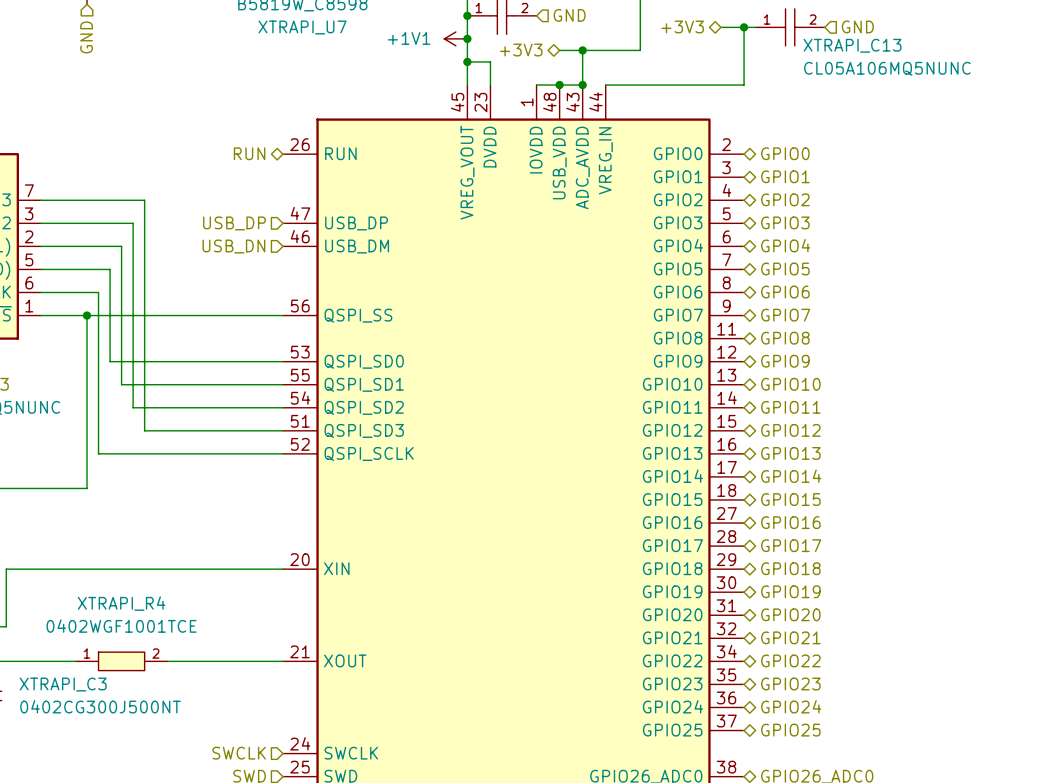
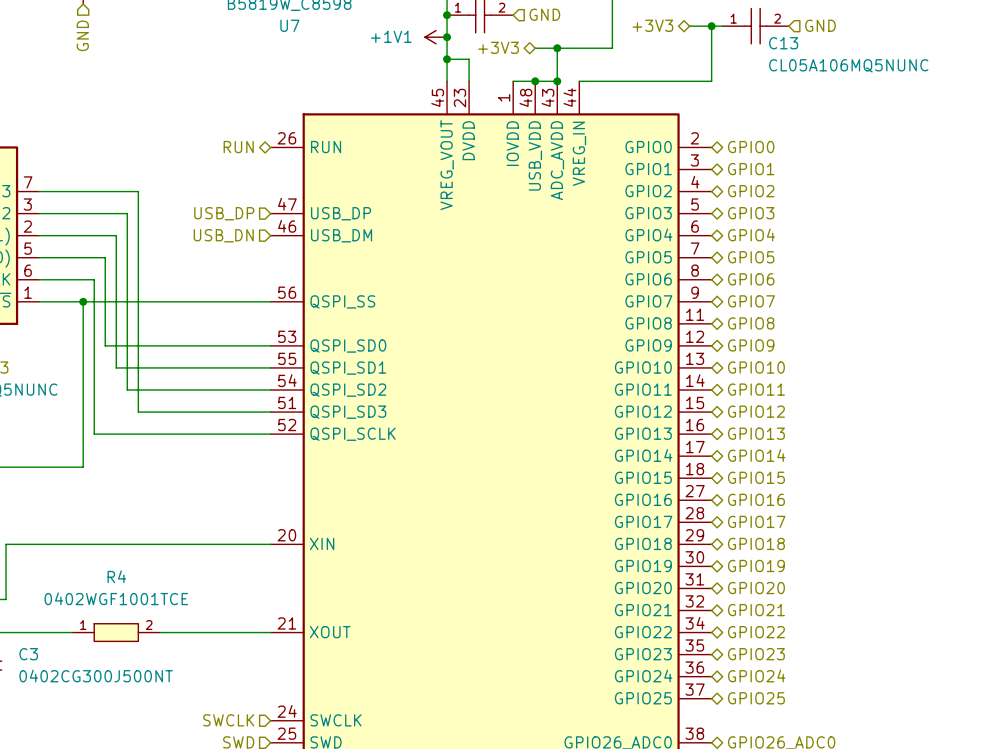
XTRAPI_U7 name: XTRAPI_U7 (302, 27) -> U7 (289, 25)
XTRAPI_C13 name: XTRAPI_C13 (852, 45) -> C13 (783, 43)
XTRAPI_R4 name: XTRAPI_R4 (121, 603) -> R4 (116, 576)
XTRAPI_C3 name: XTRAPI_C3 (63, 684) -> C3 (28, 654)

